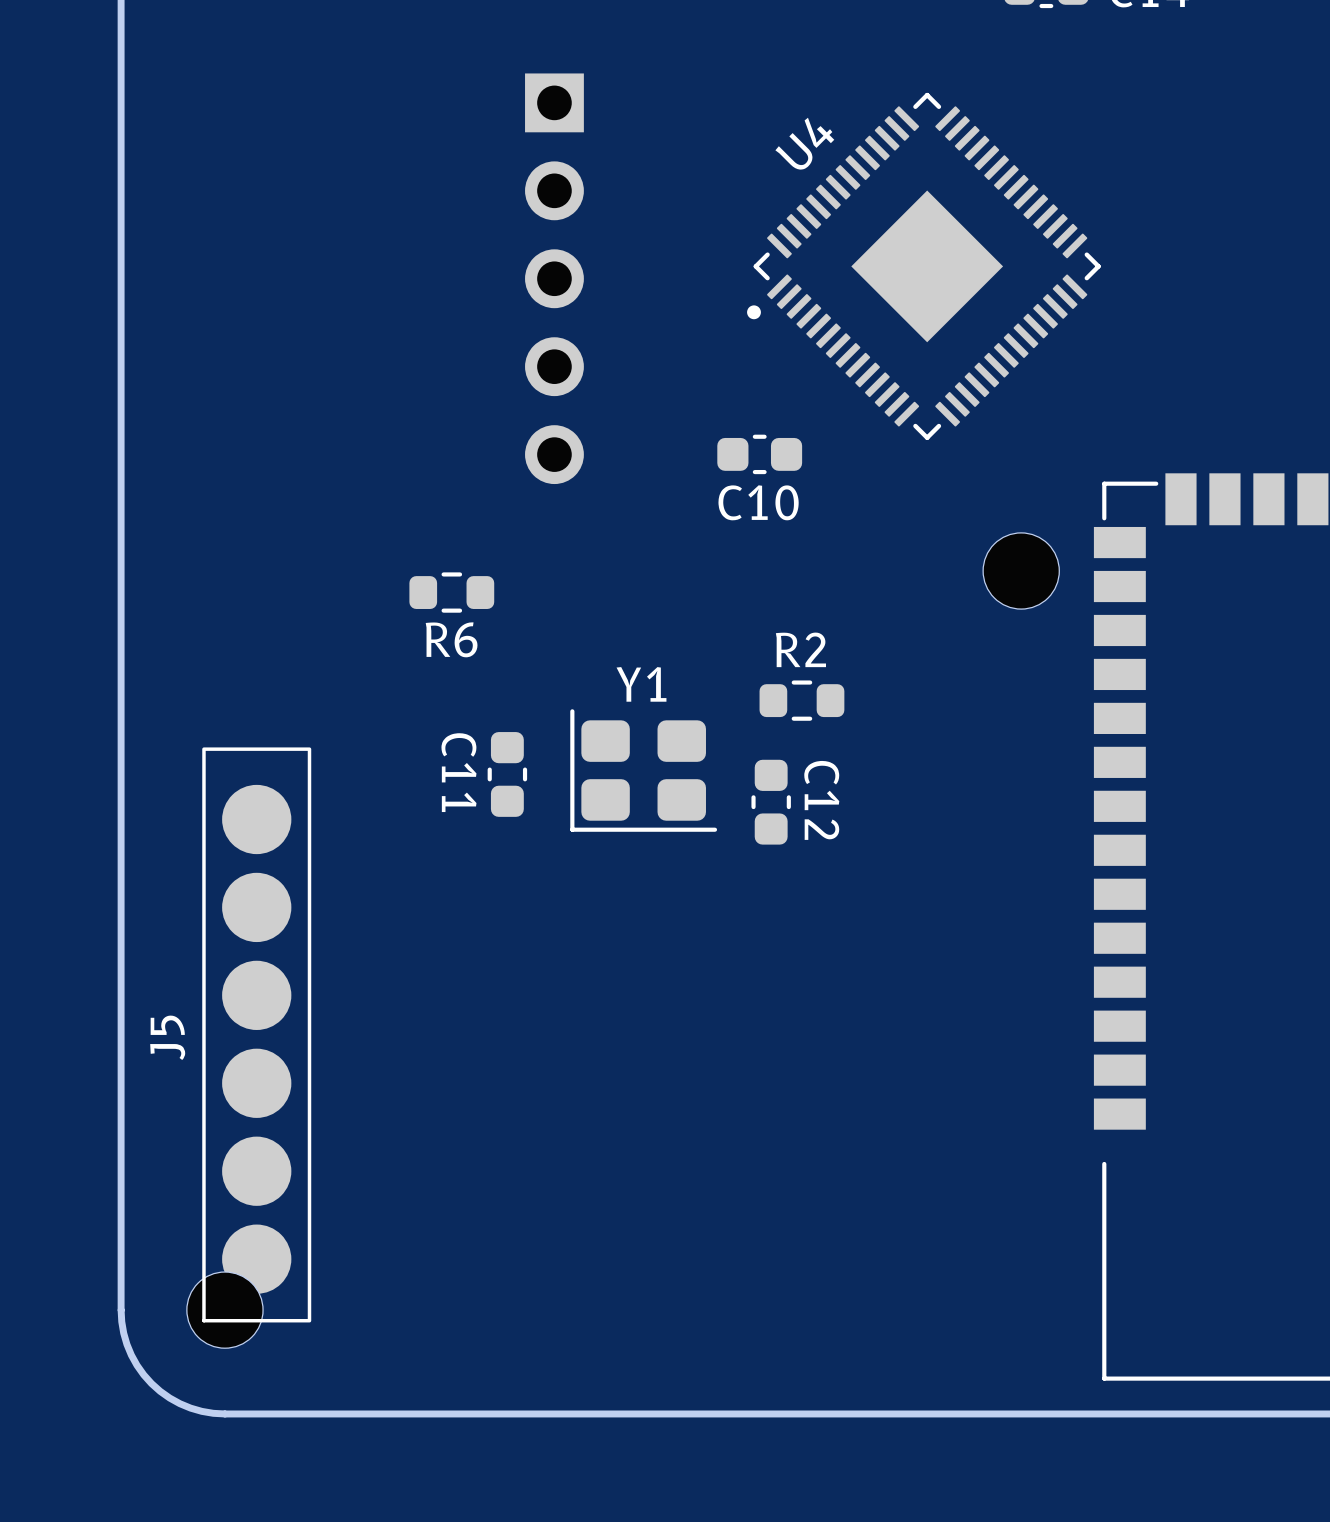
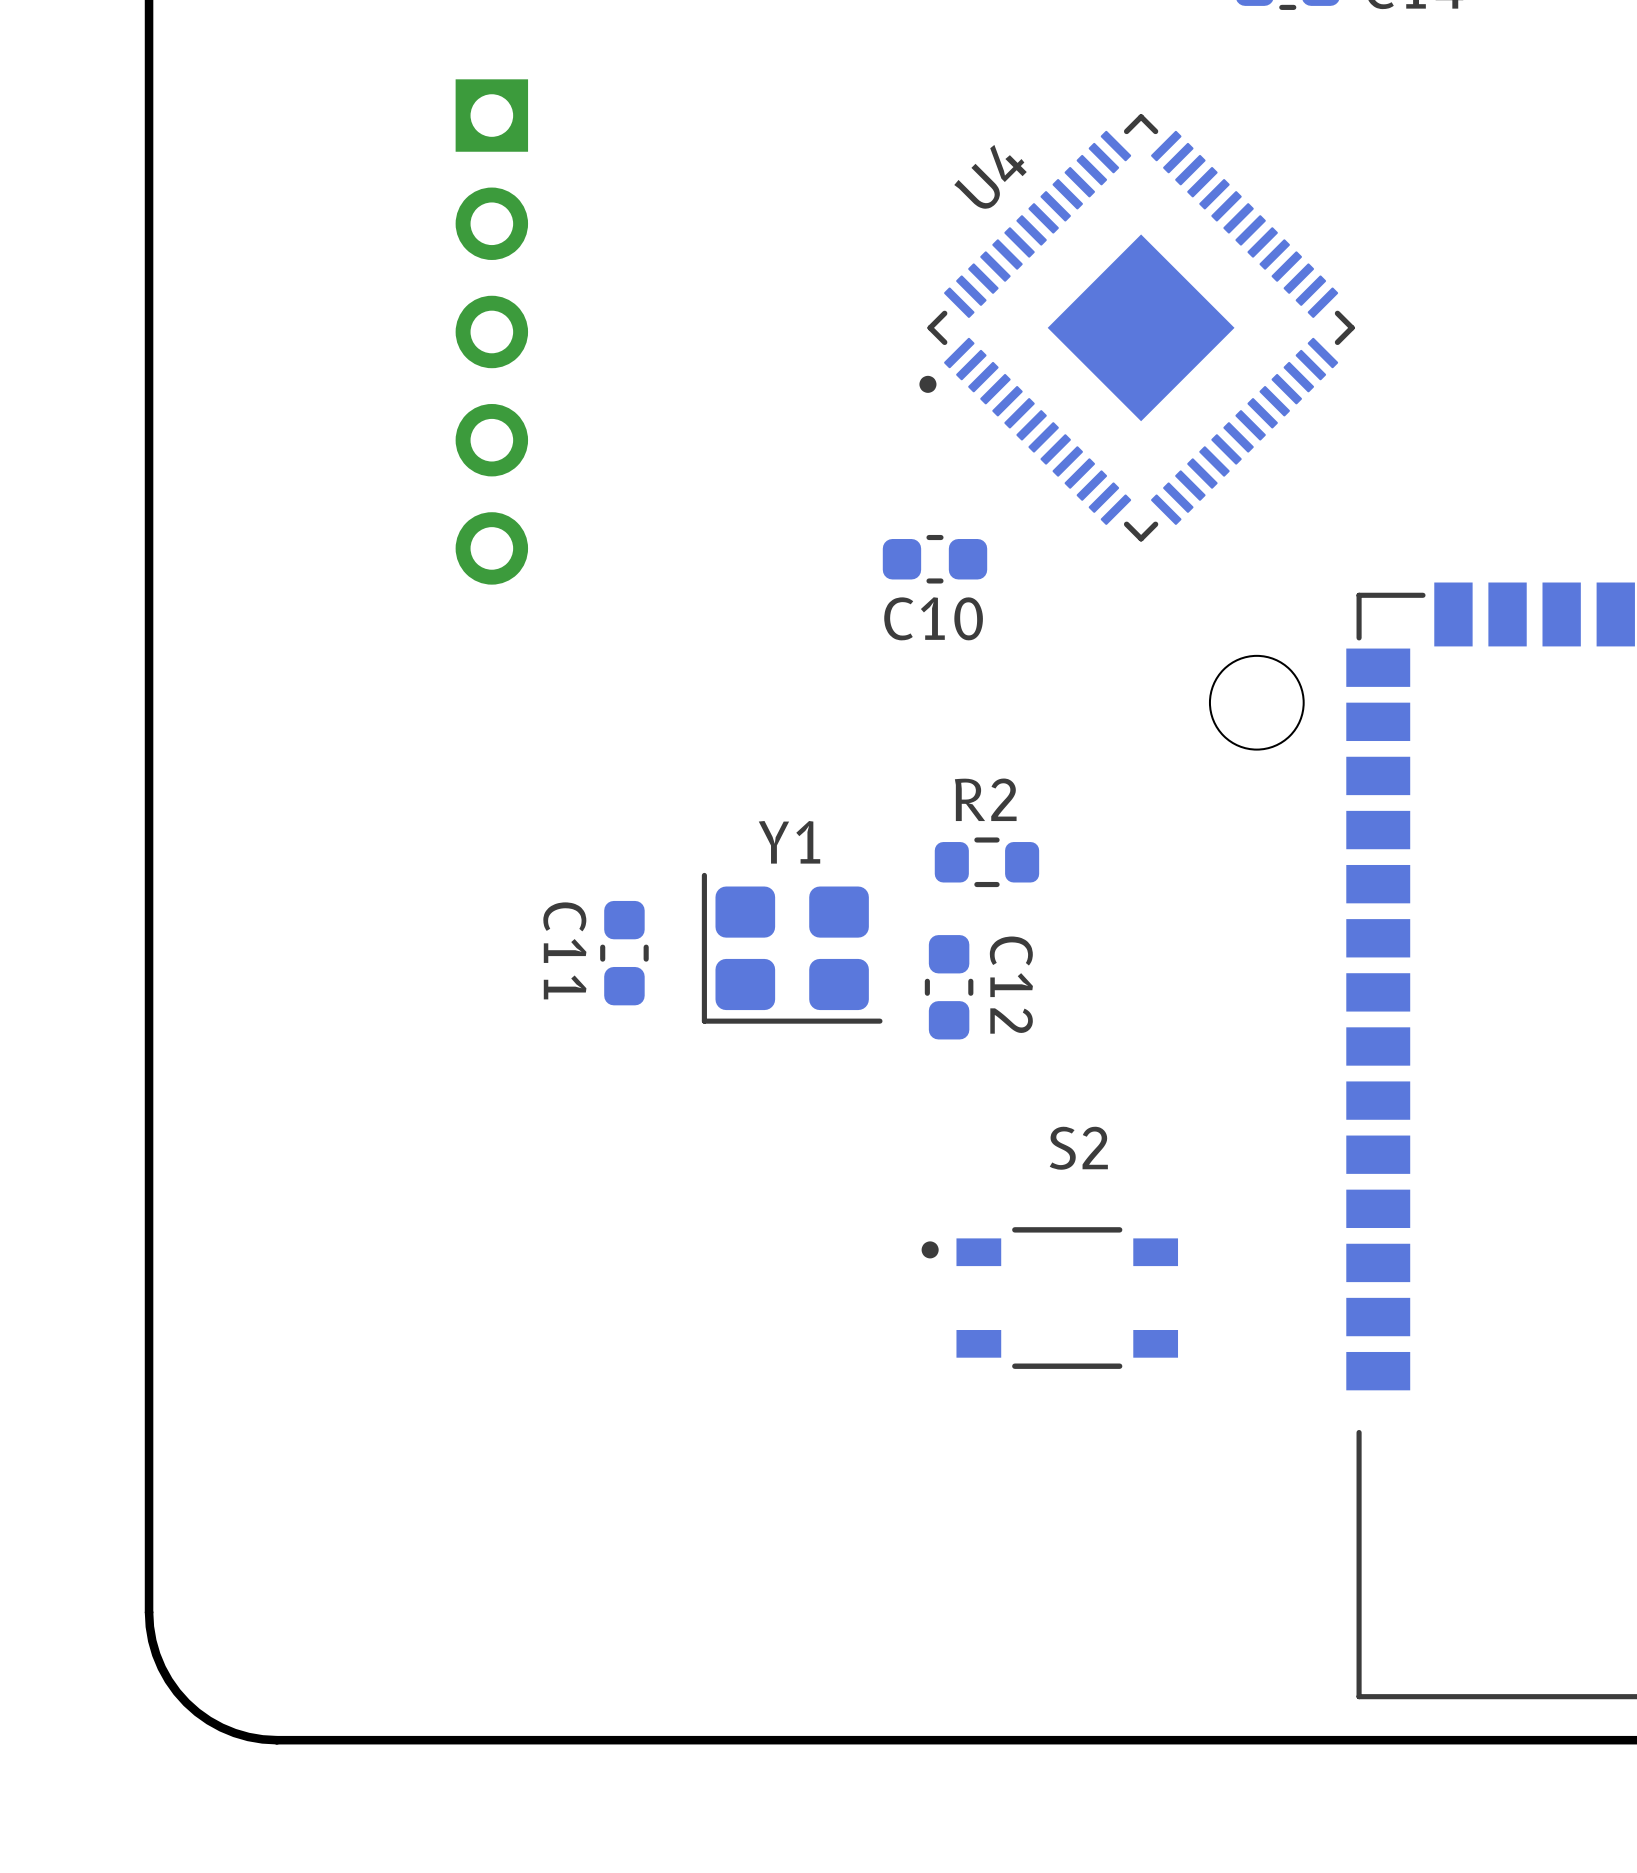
part position: (554, 278) -> (491, 331)
R6: (451, 592) -> none
J5: (256, 1034) -> none
S2: none -> (1049, 1298)
part: (224, 1310) -> none

